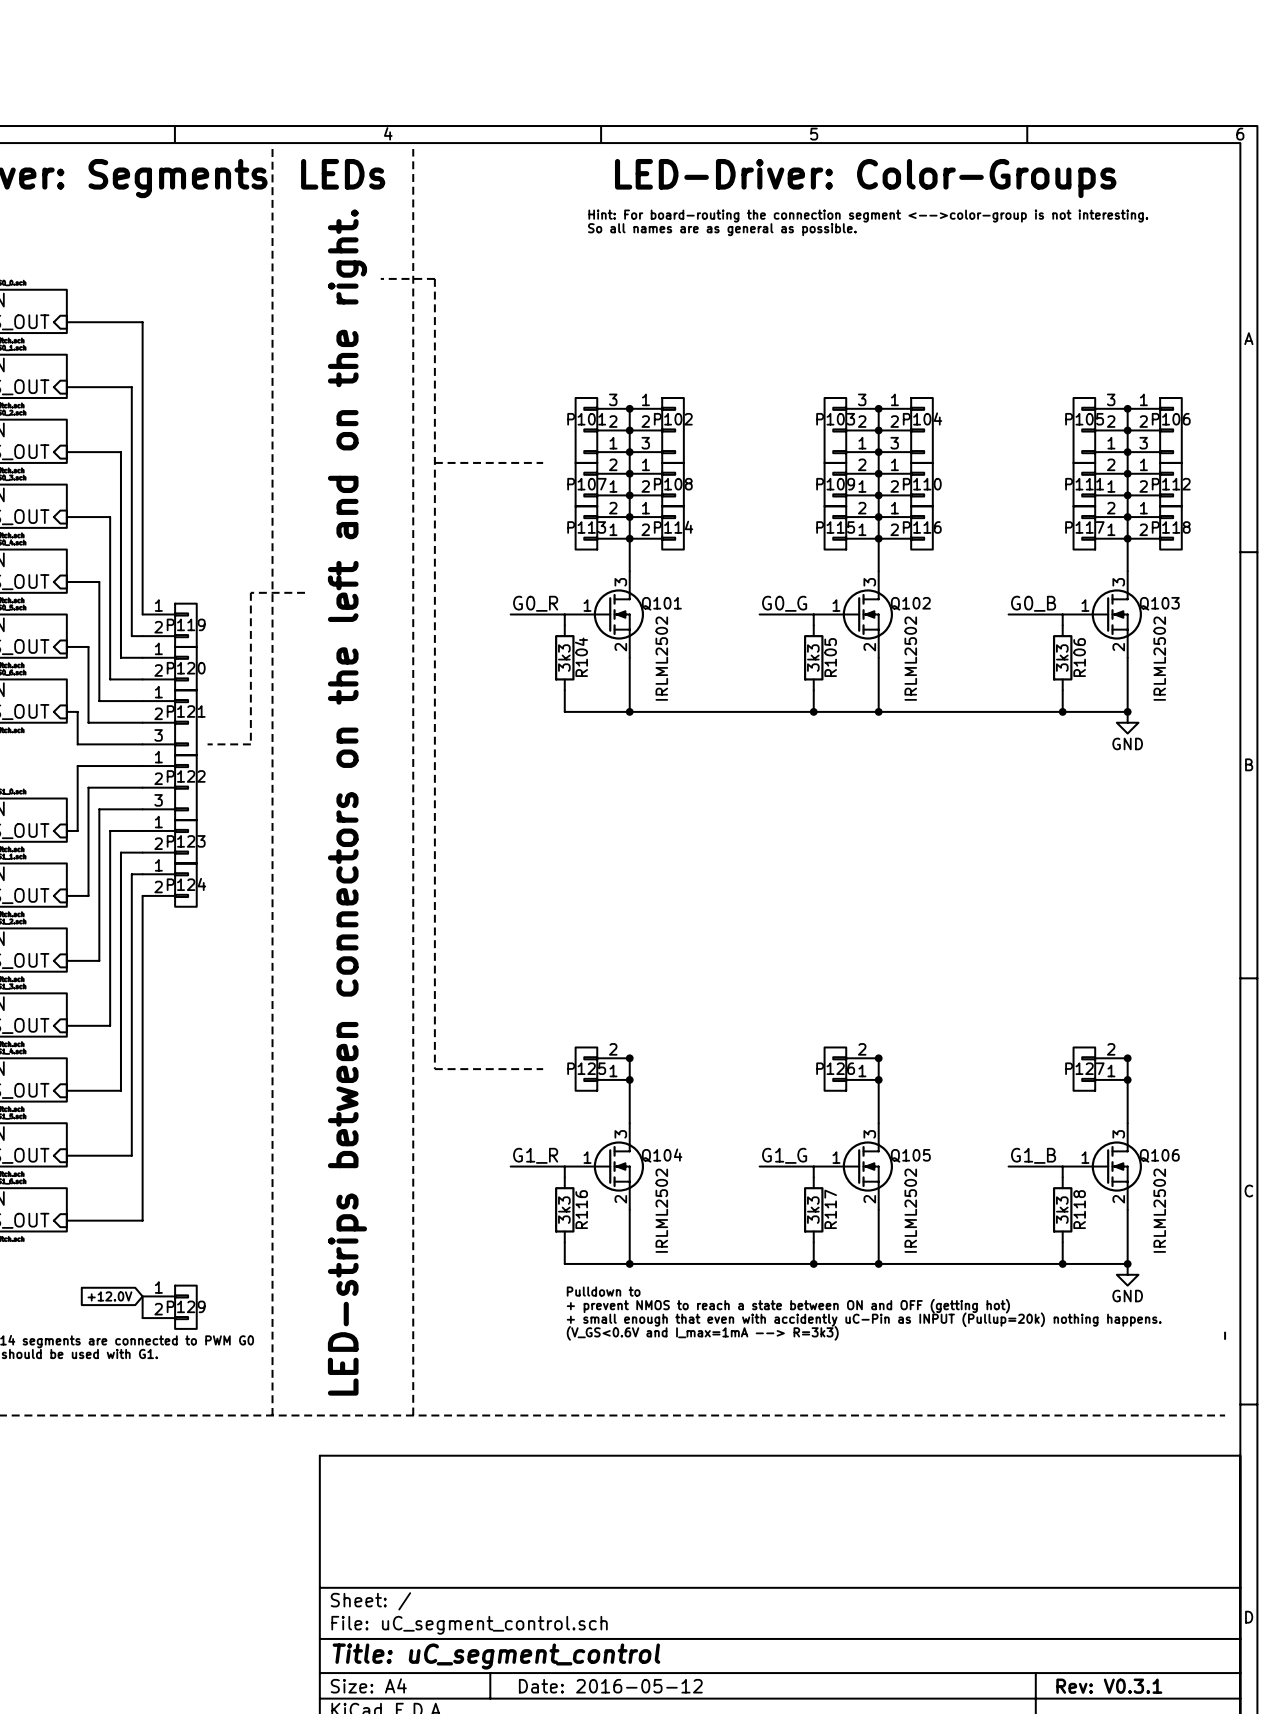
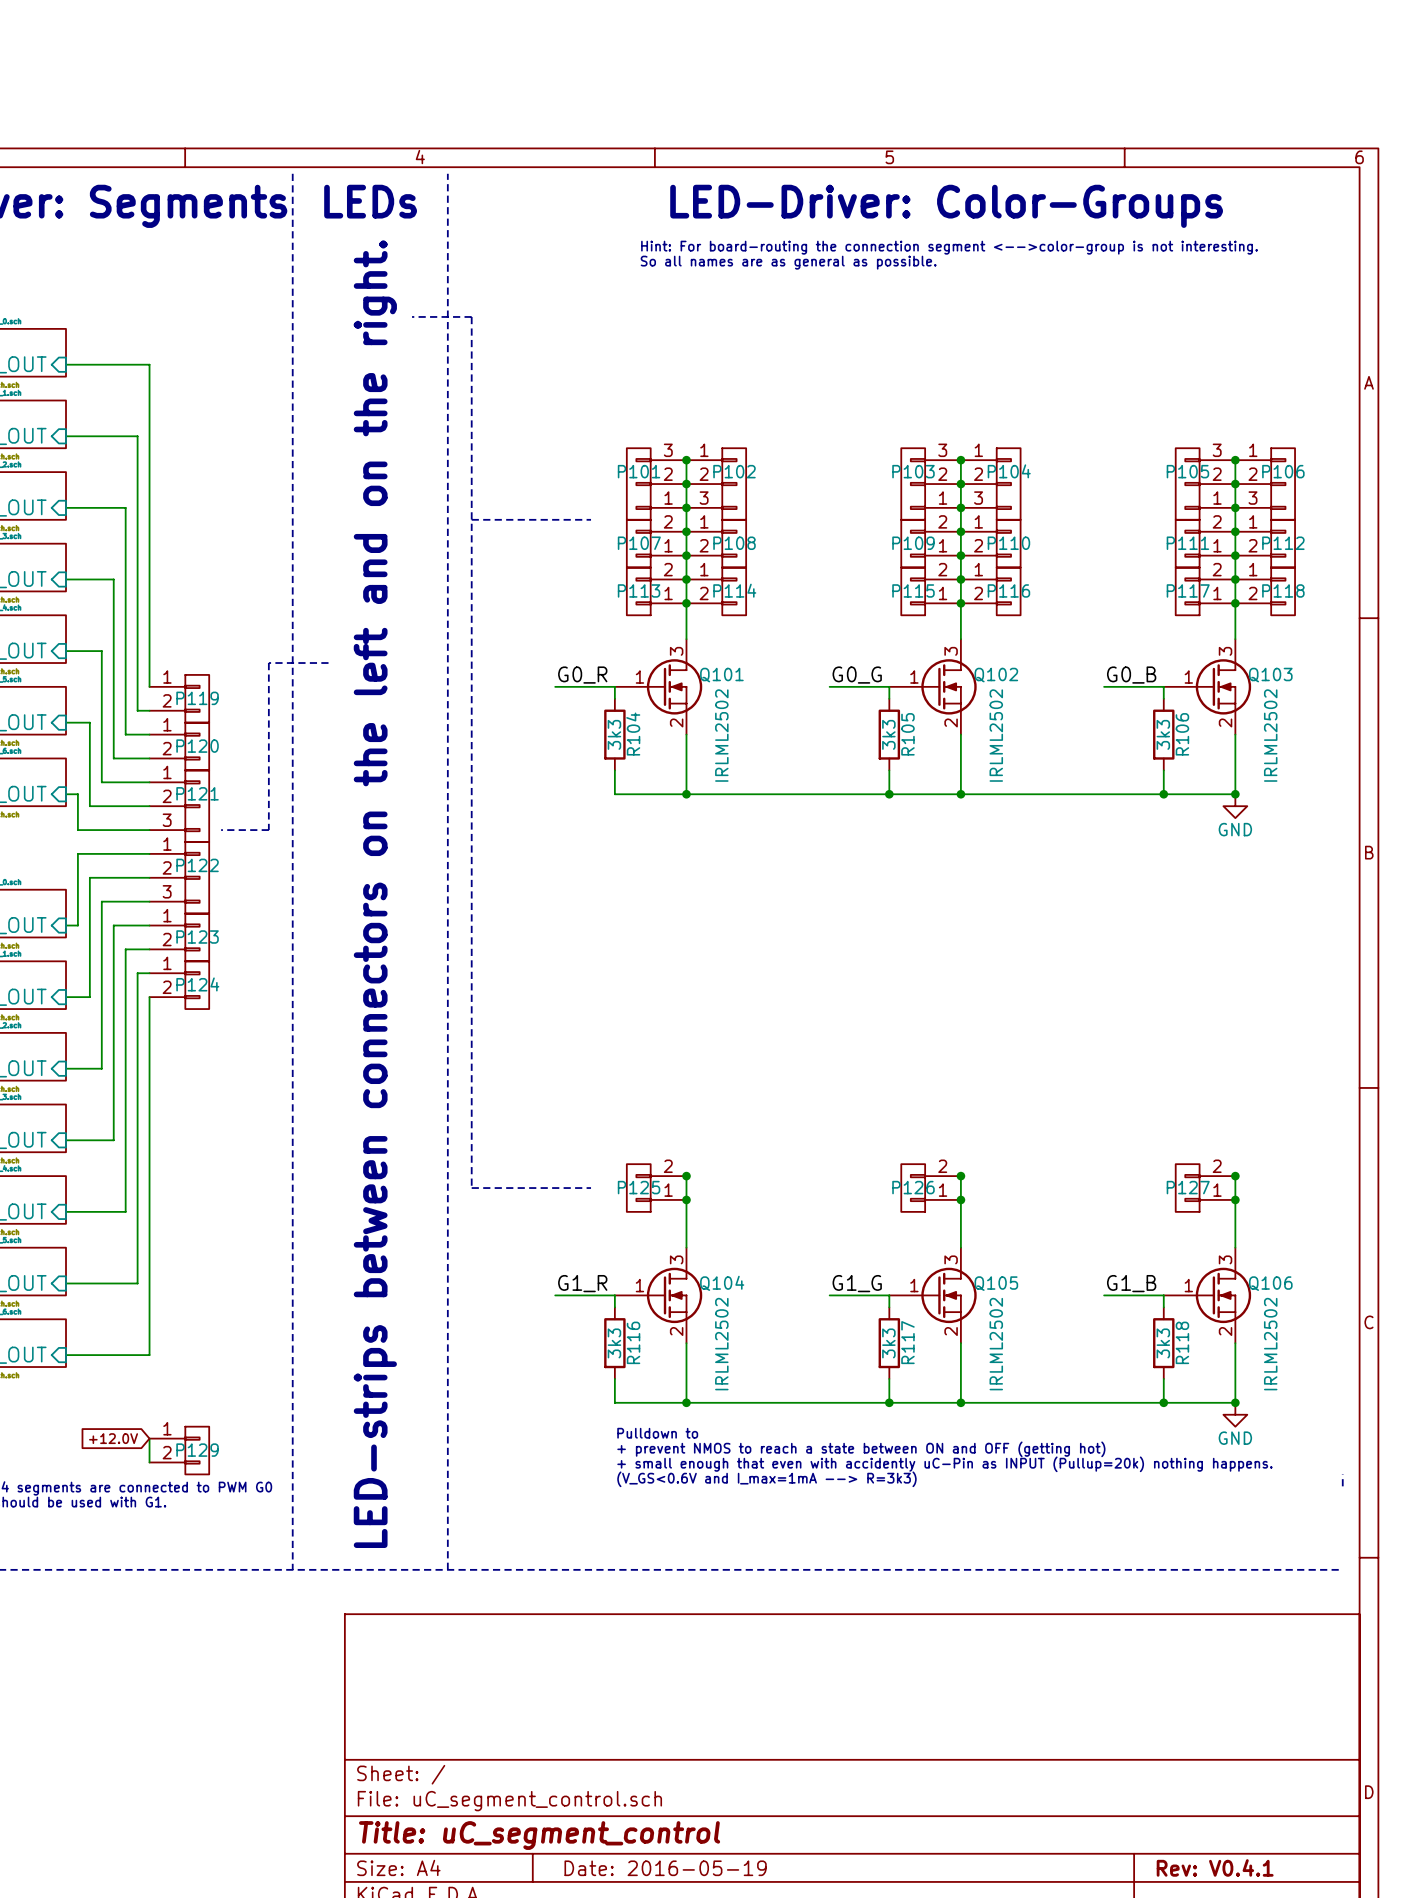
title block: Date: 2016-05-12 (610, 1686) -> Date: 2016-05-19 (665, 1868)
title block: Rev: V0.3.1 (1109, 1686) -> Rev: V0.4.1 (1215, 1867)

